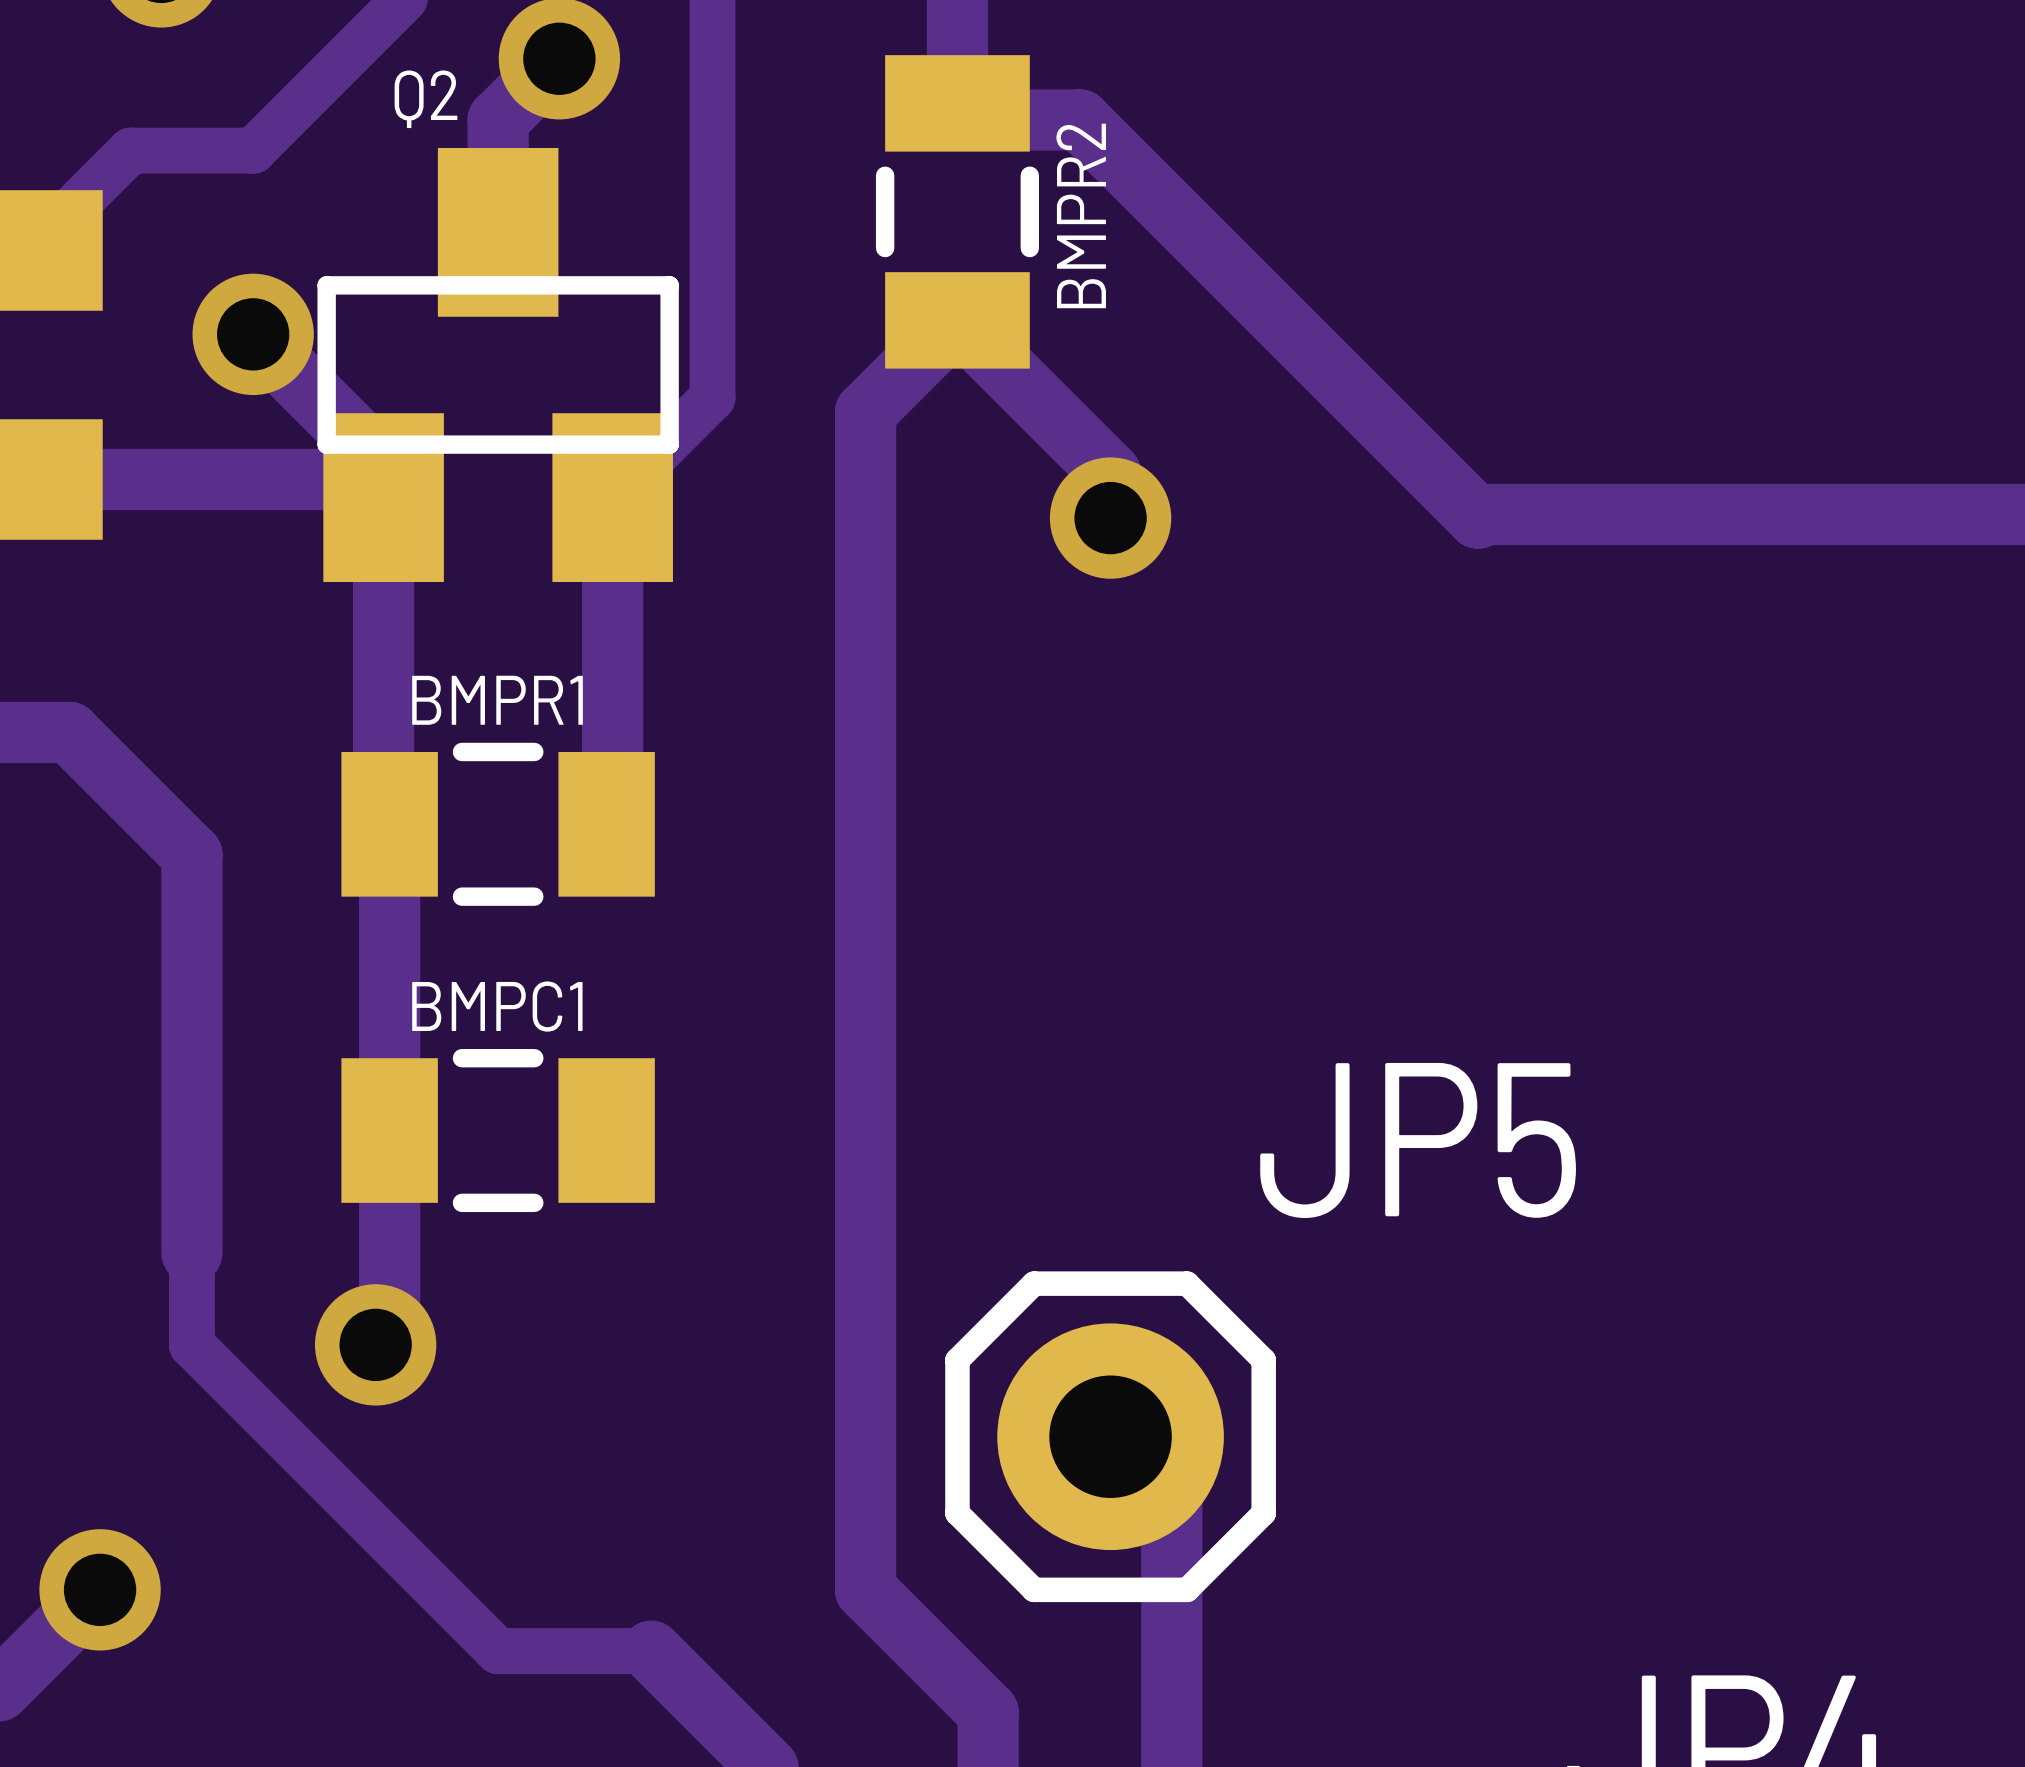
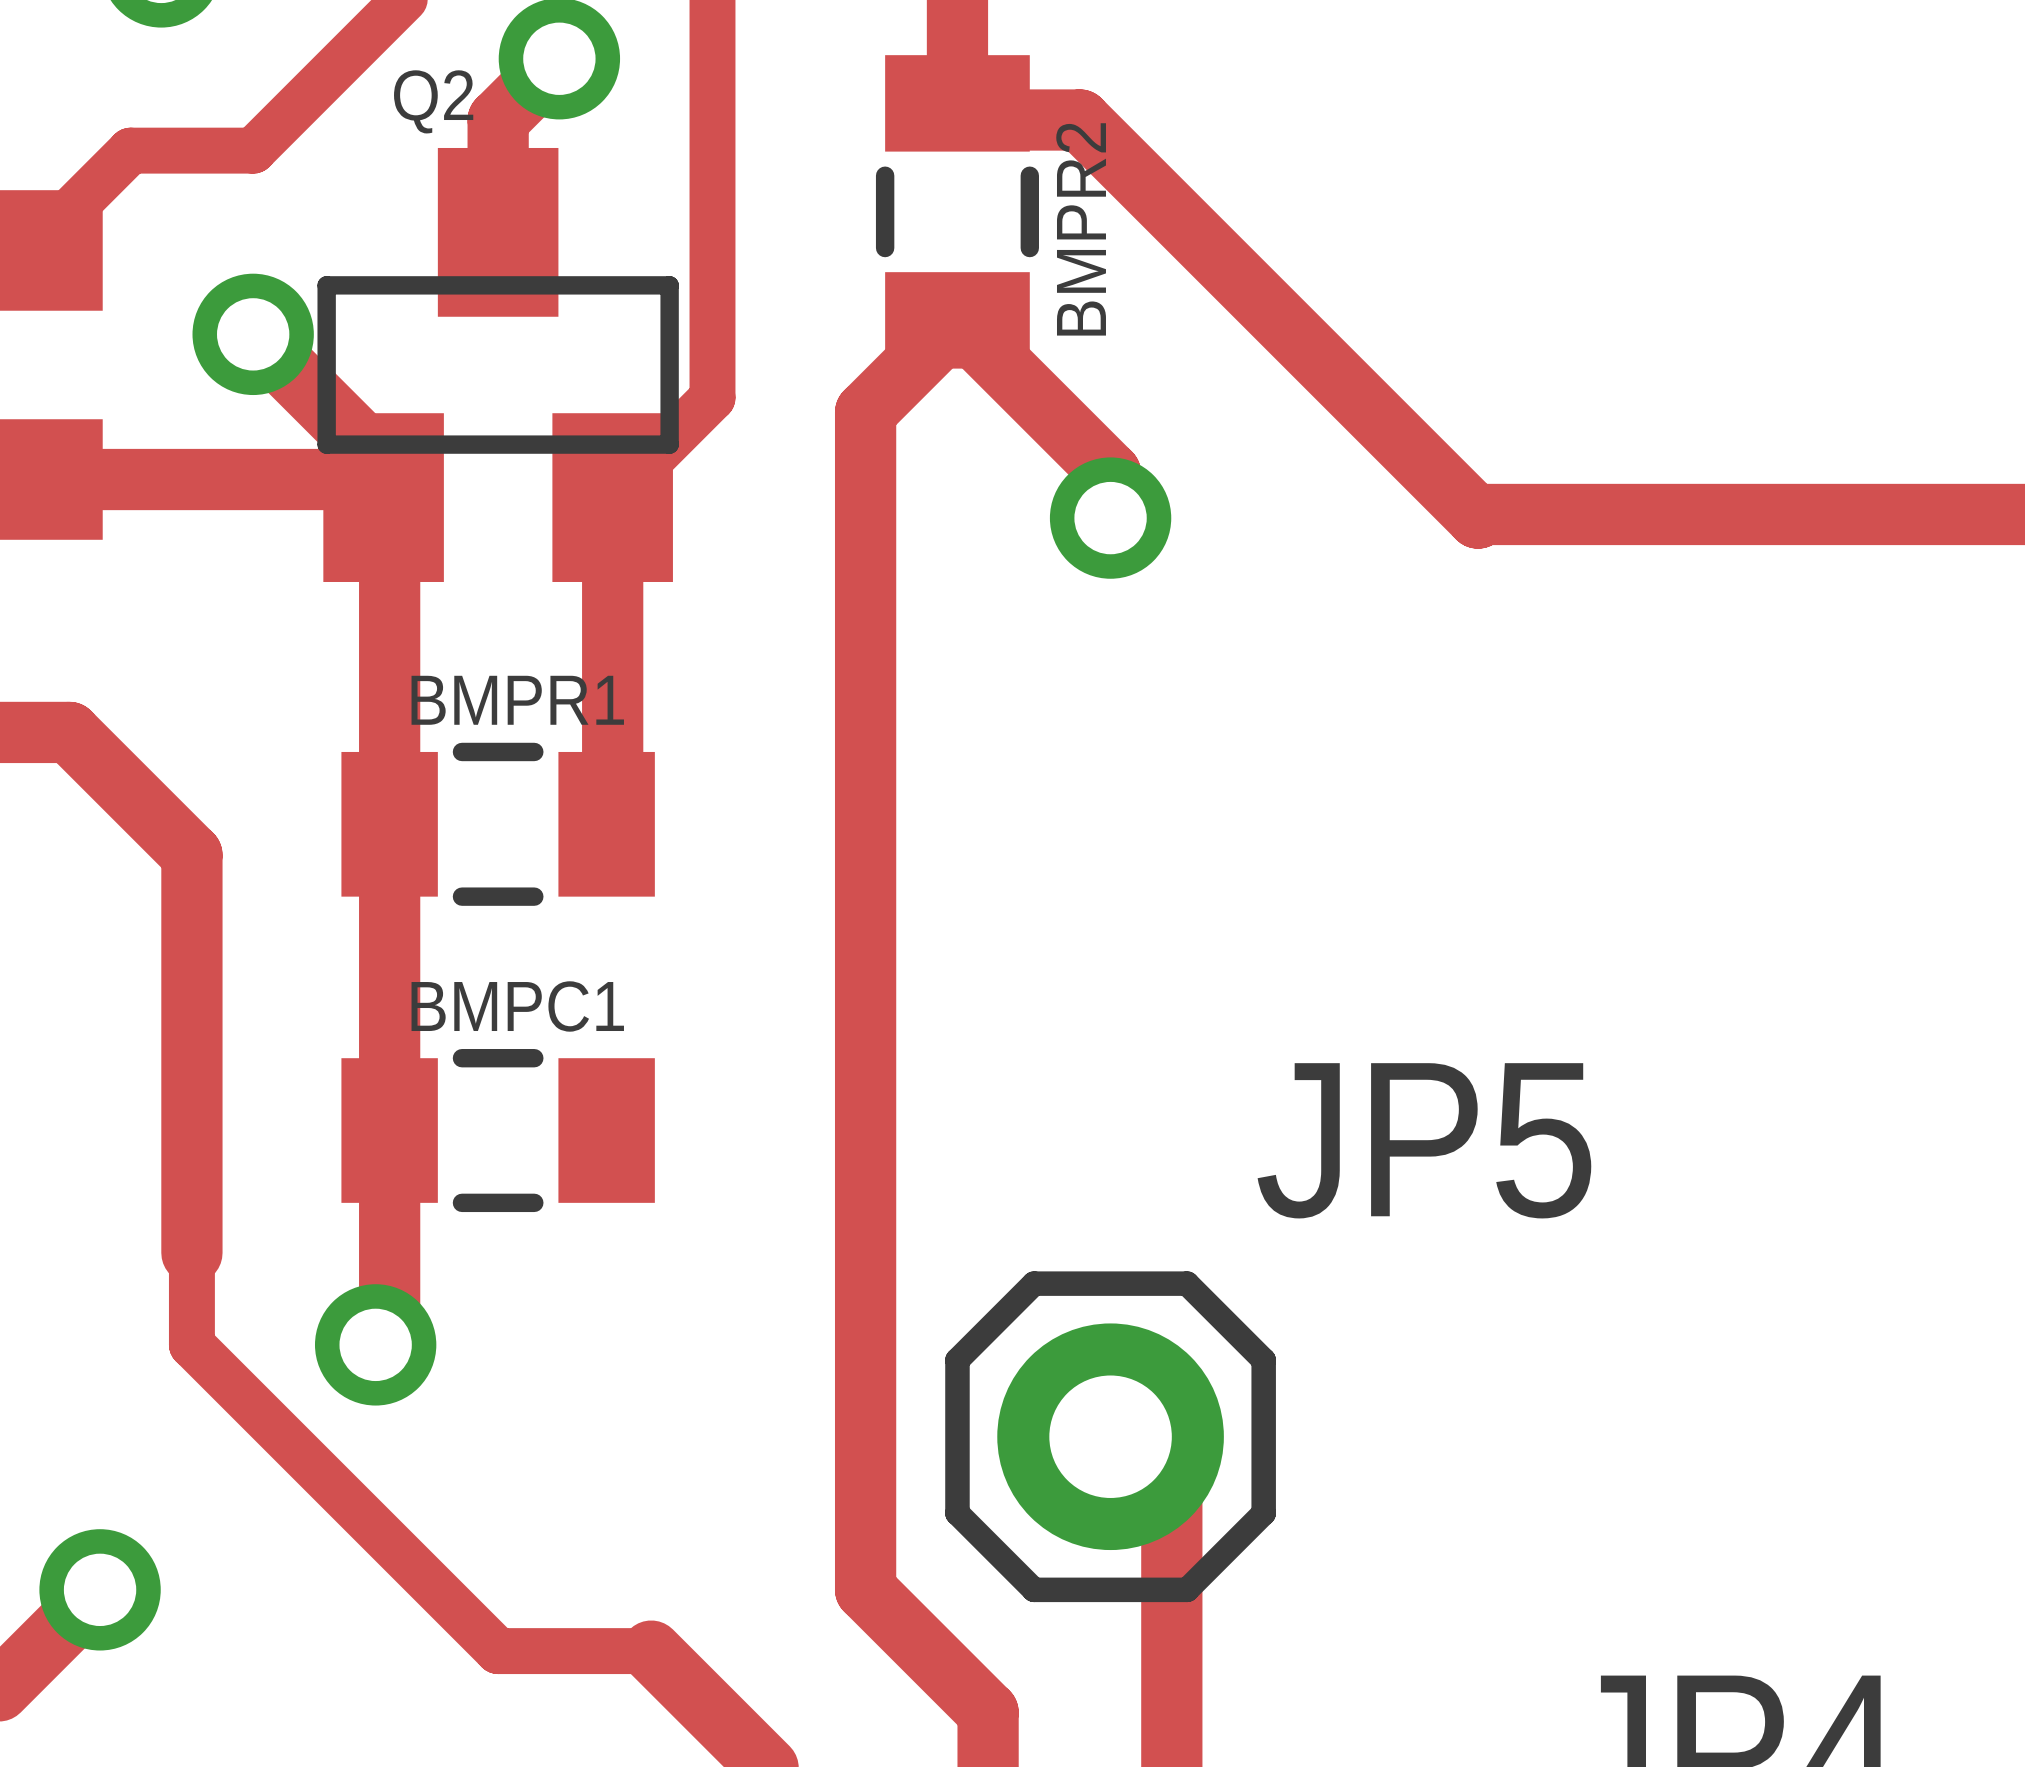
track: (383, 497) (383, 793) (375, 793) (375, 824) (389, 824) -> (383, 497) (389, 503) (389, 824)

